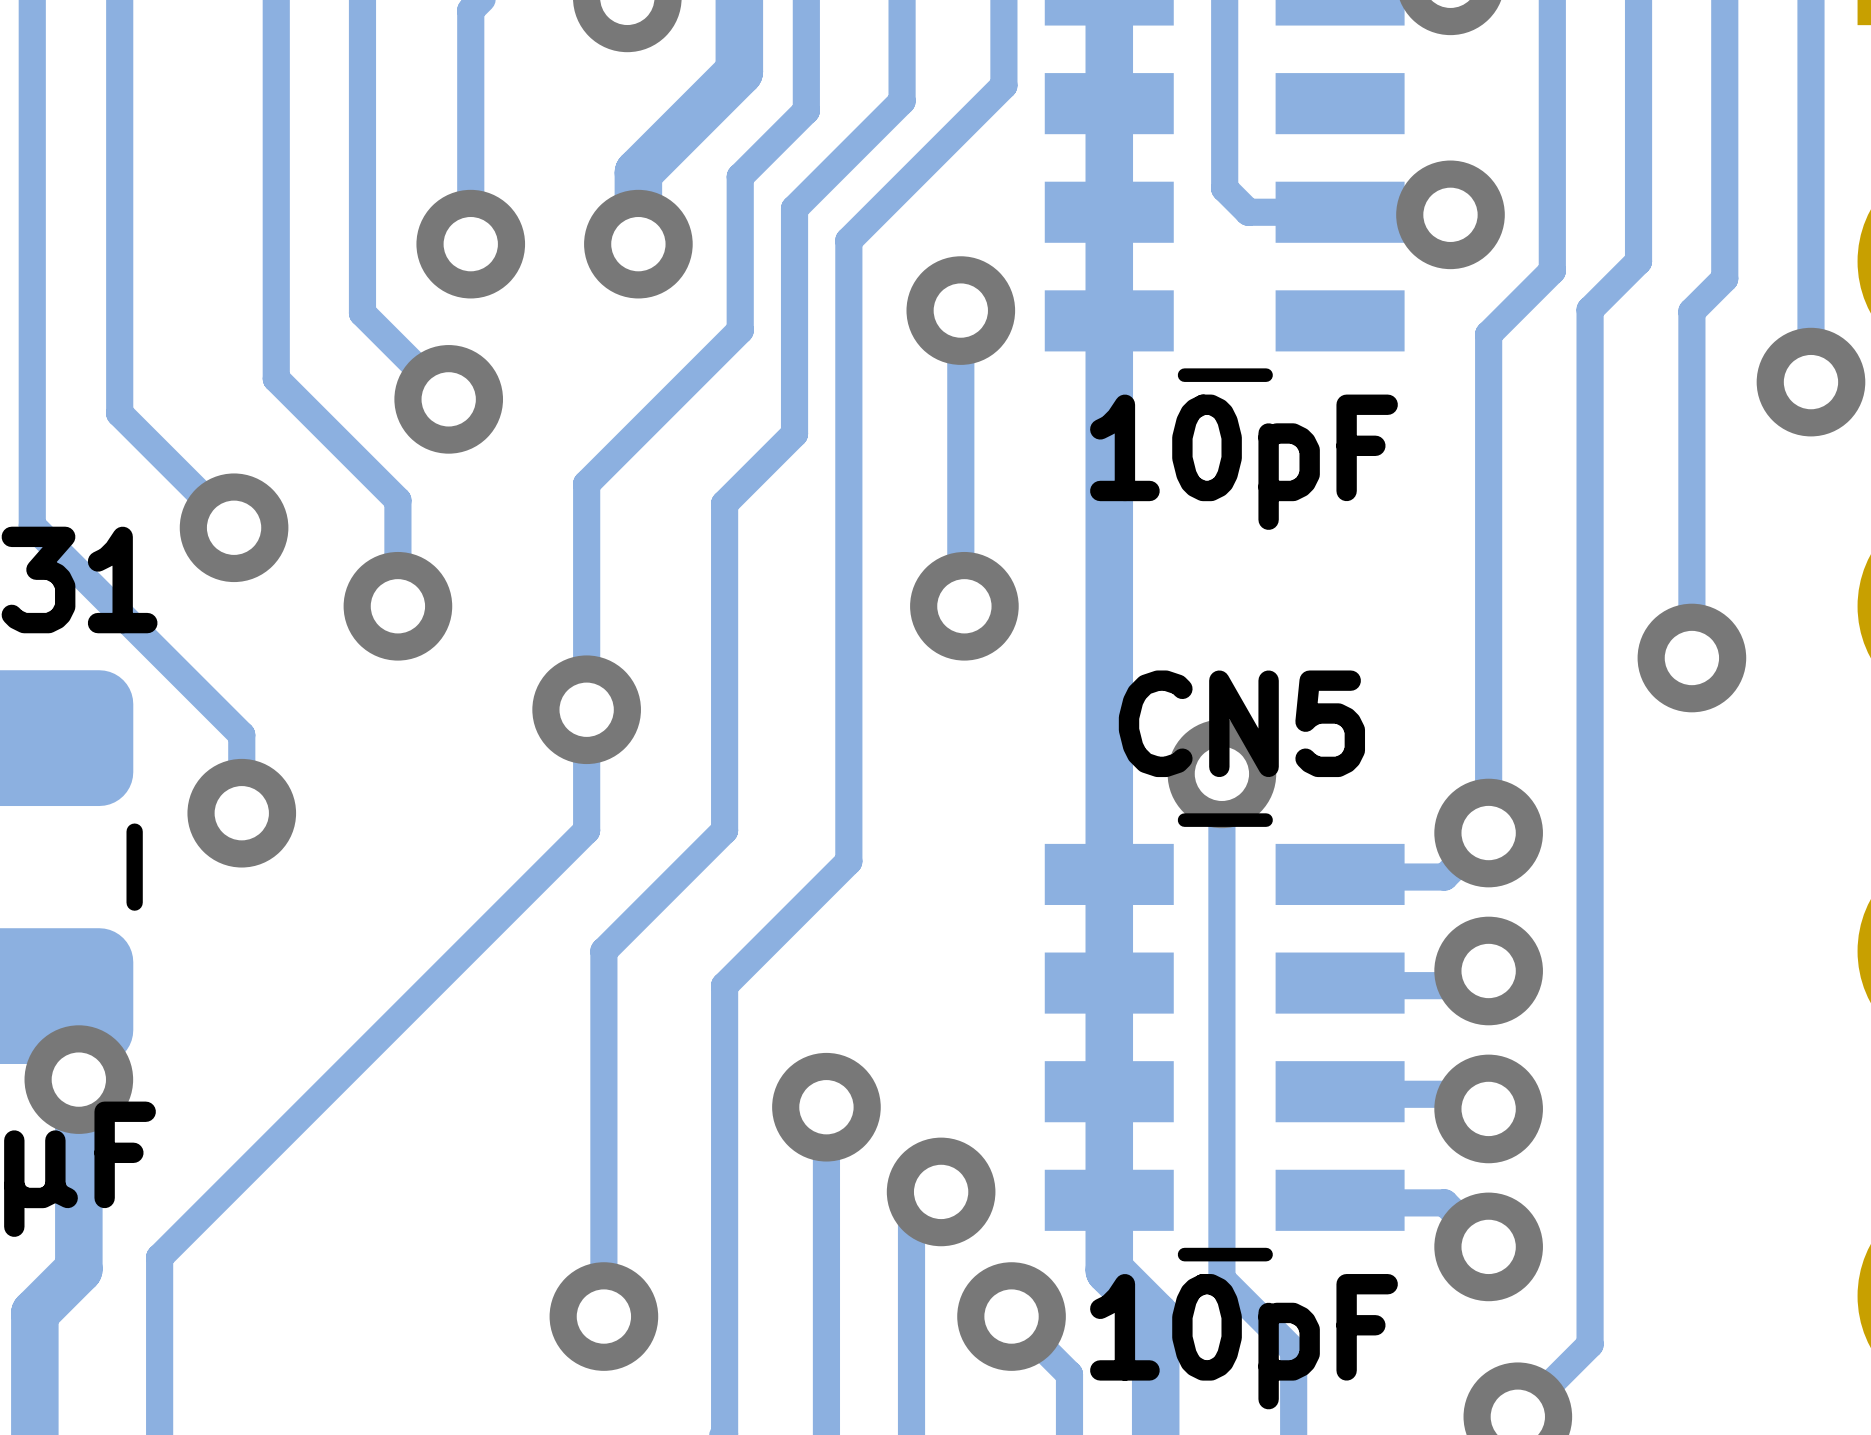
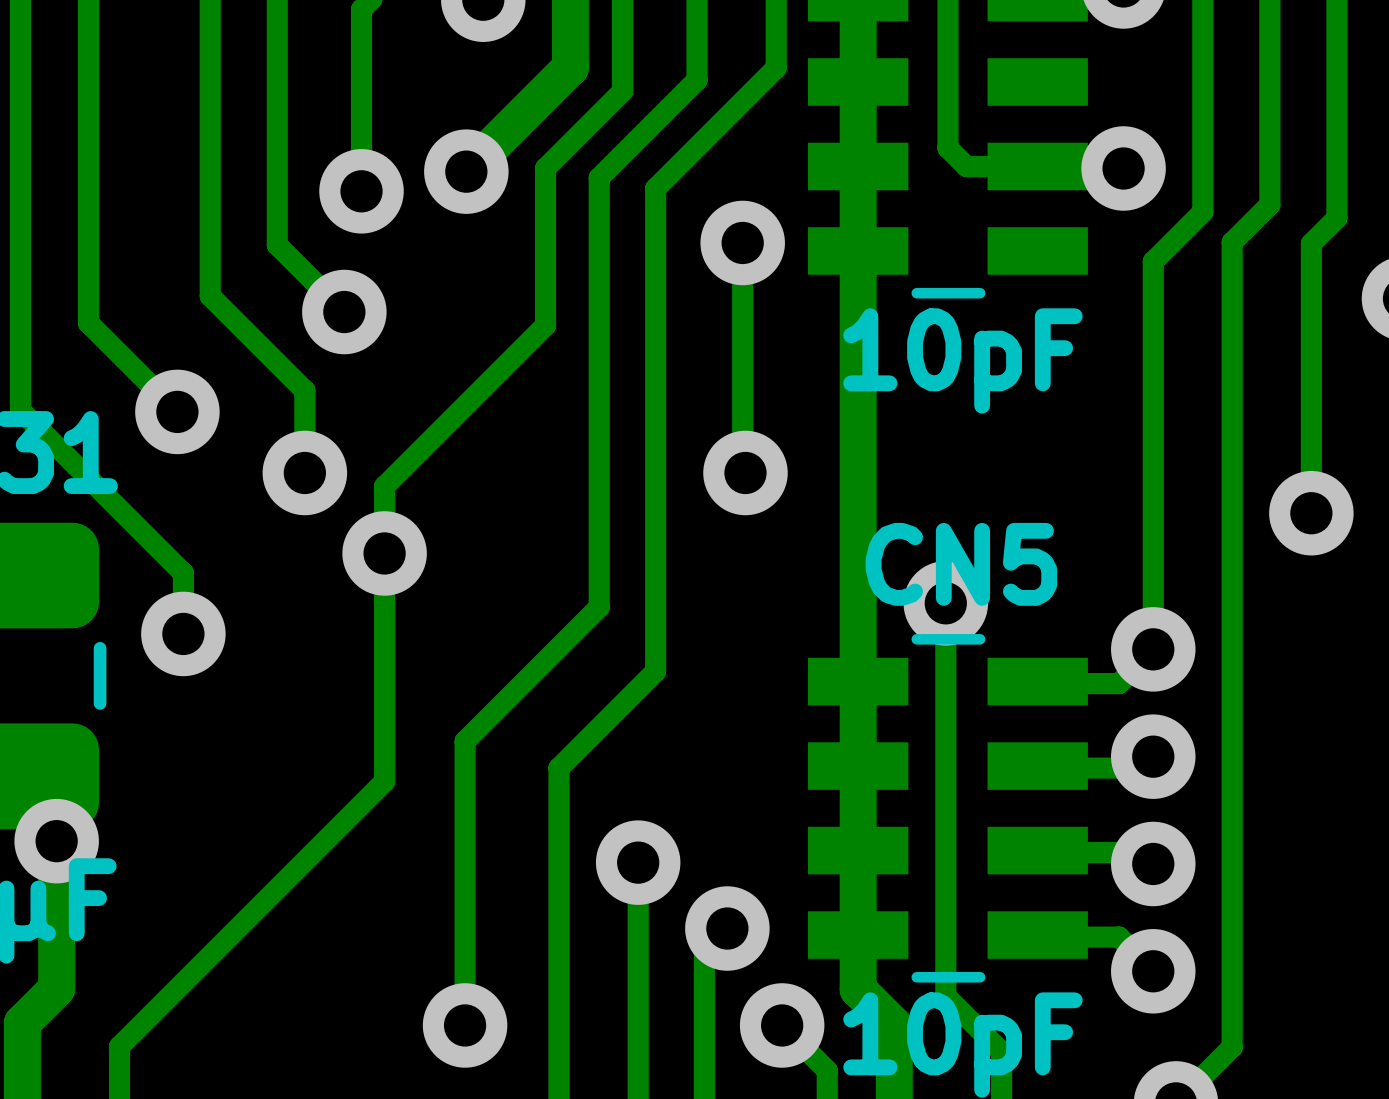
track: (739, 71) (638, 172) (638, 244) -> (570, 57) (570, 67) (466, 171)
track: (806, 110) (740, 176) (740, 330) (586, 483) (586, 830) (159, 1257) (159, 1343) -> (622, 87) (622, 91) (545, 168) (545, 325) (384, 486) (384, 781) (119, 1046)
track: (794, 208) (794, 433) (724, 503) (724, 830) -> (613, 163) (599, 177) (599, 607) (558, 647)
via position: (638, 244) -> (466, 171)
via position: (586, 709) -> (384, 553)

